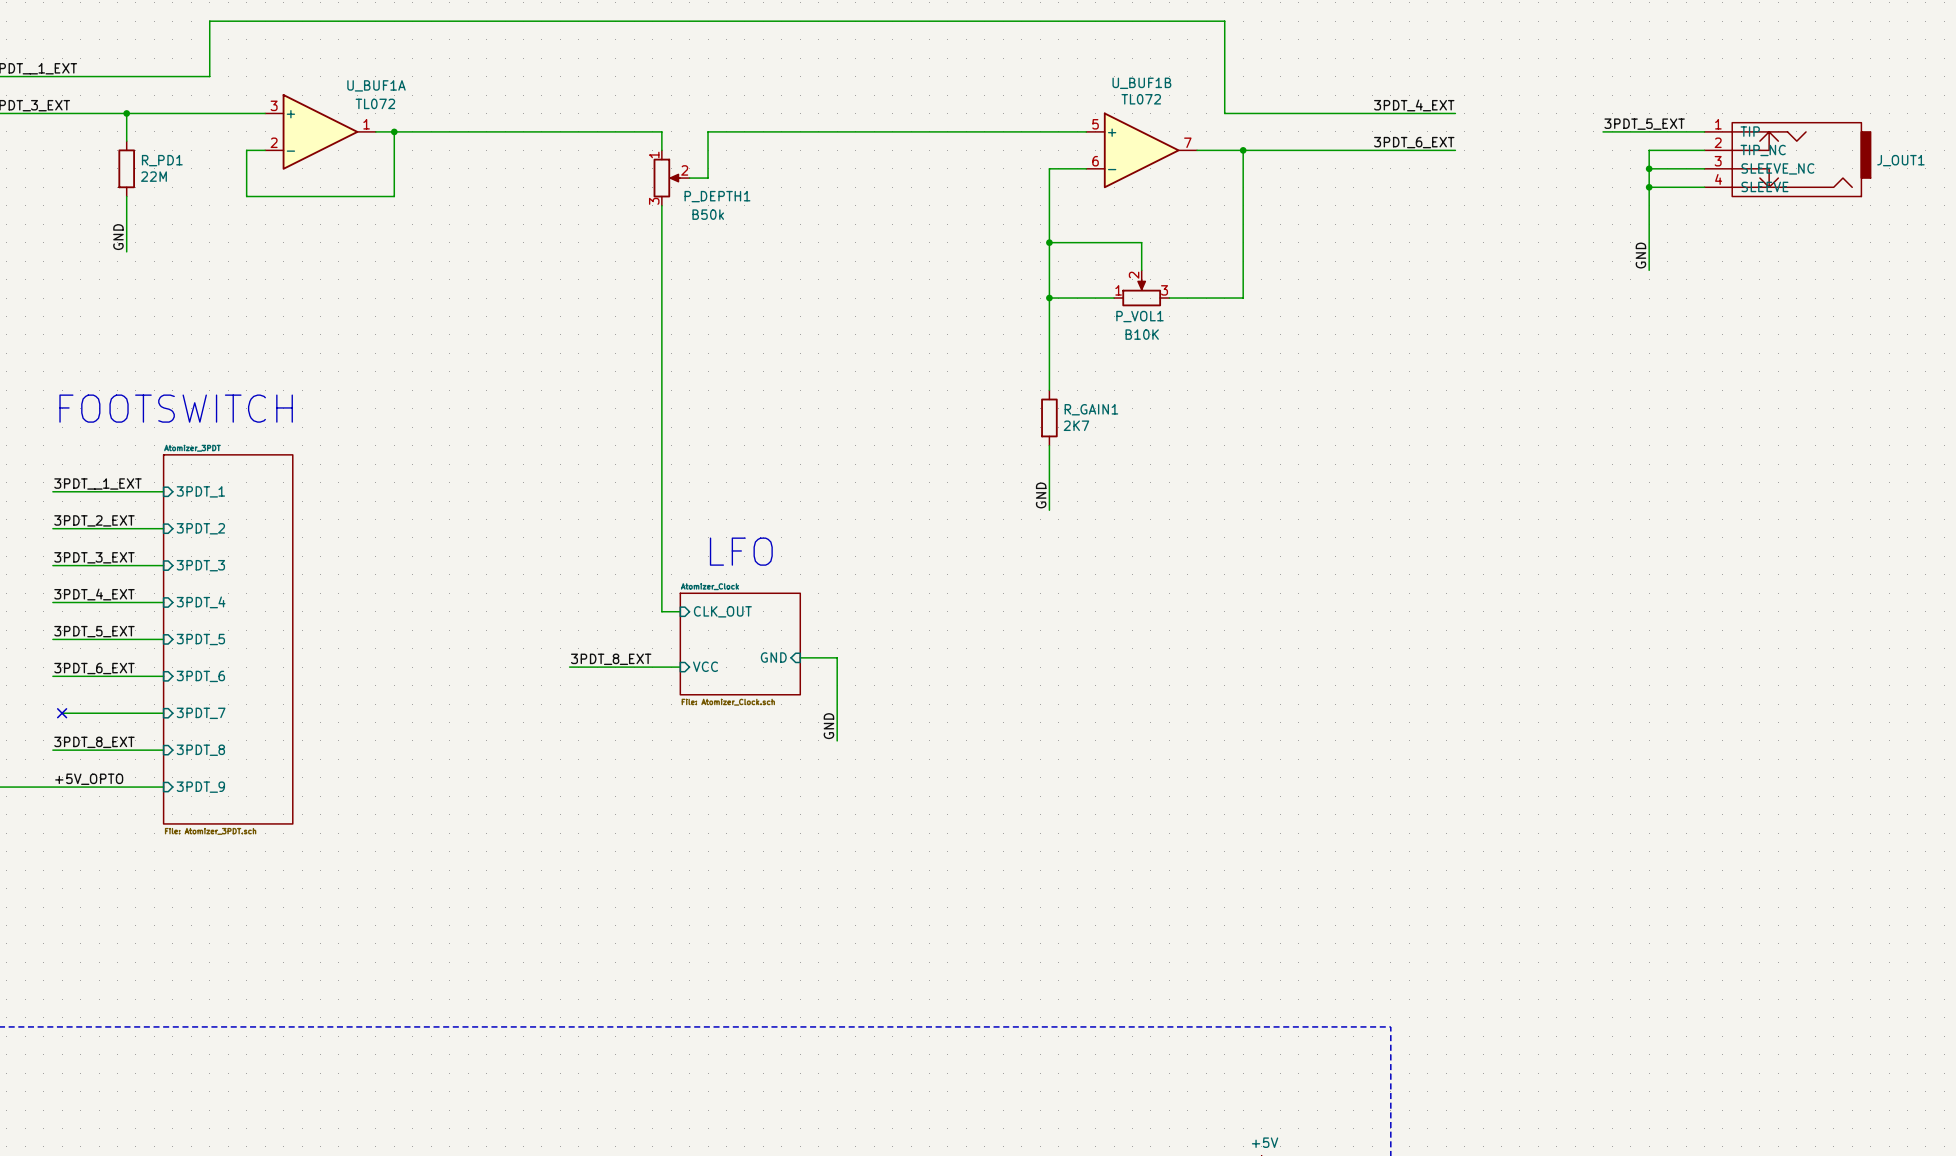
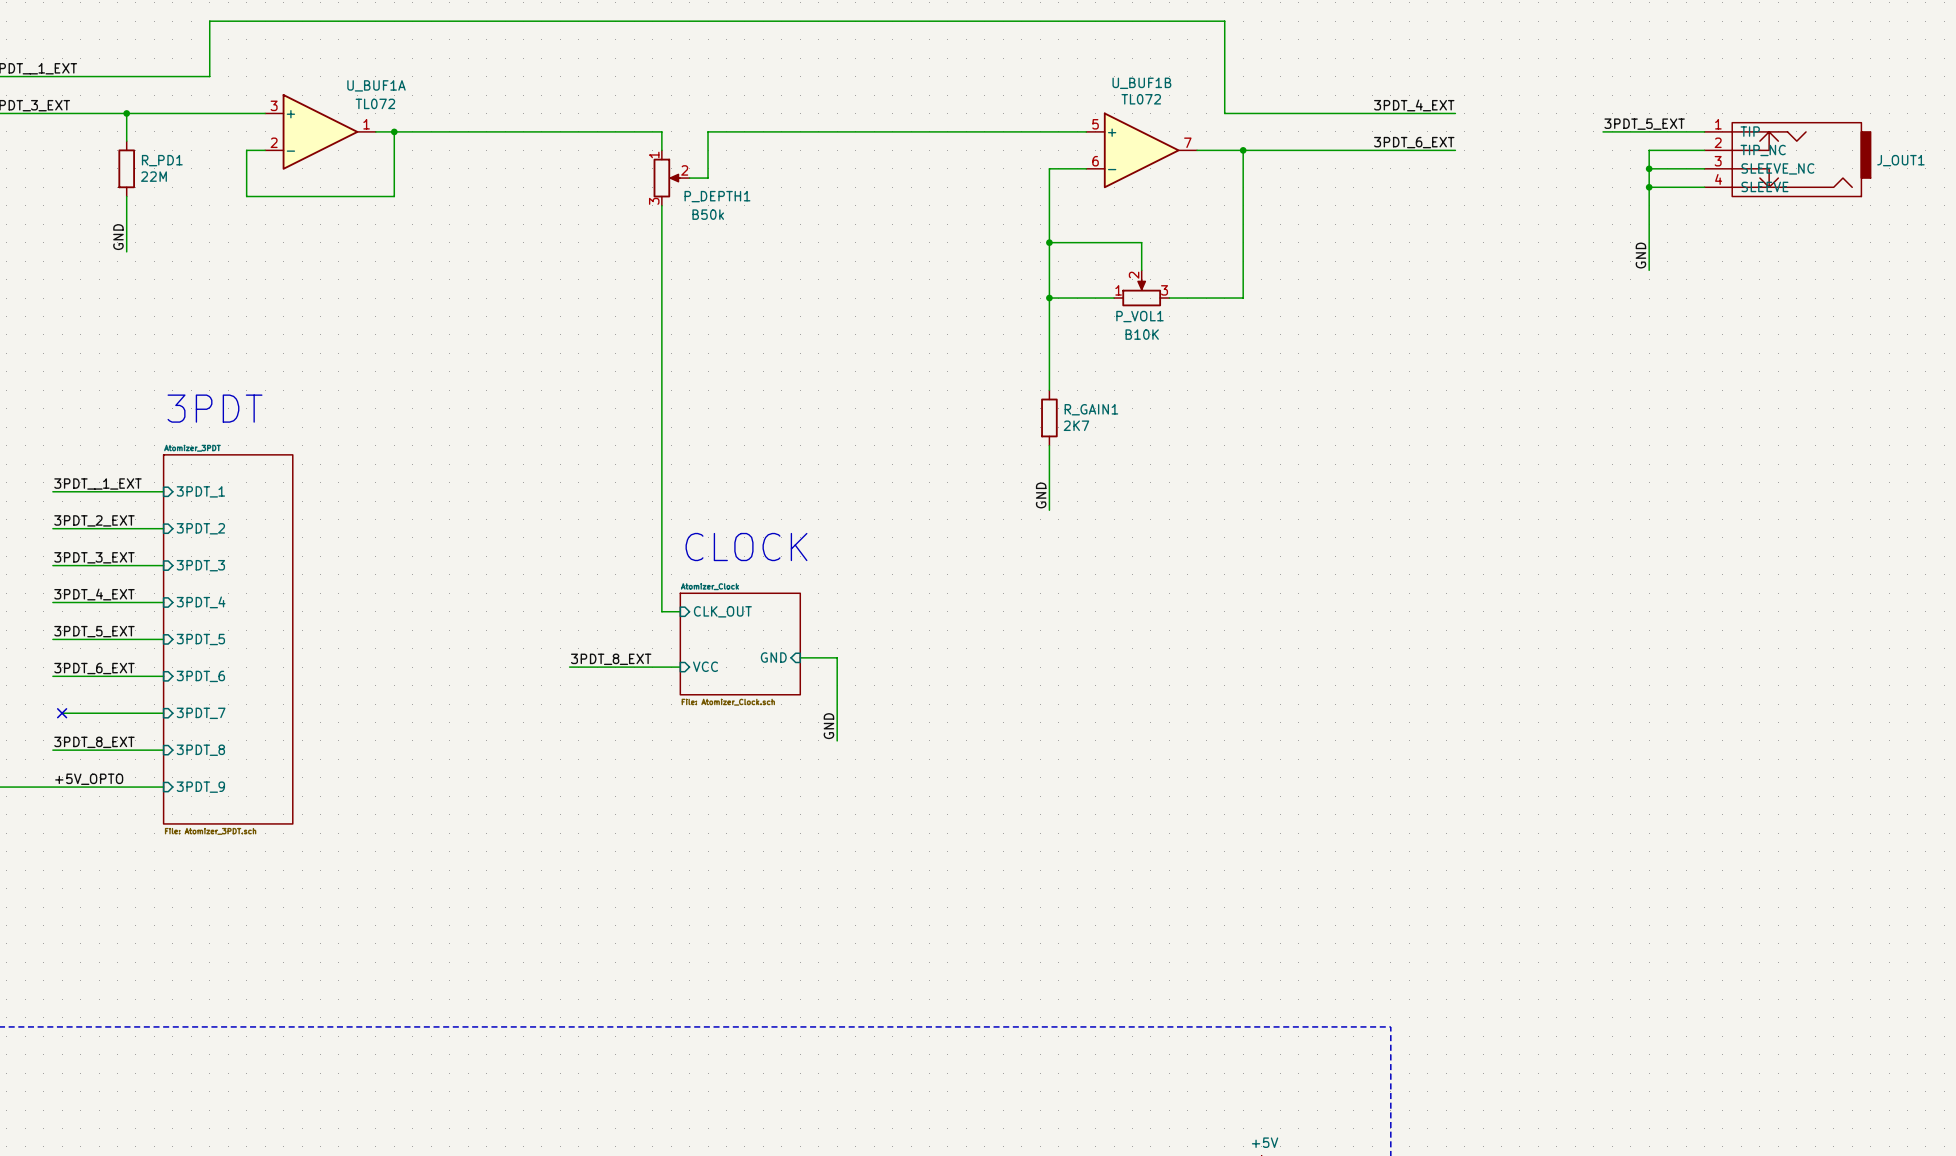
text: FOOTSWITCH (176, 408) -> none
text: none -> 3PDT (215, 408)
text: none -> CLOCK (746, 547)
text: LFO (741, 551) -> none

